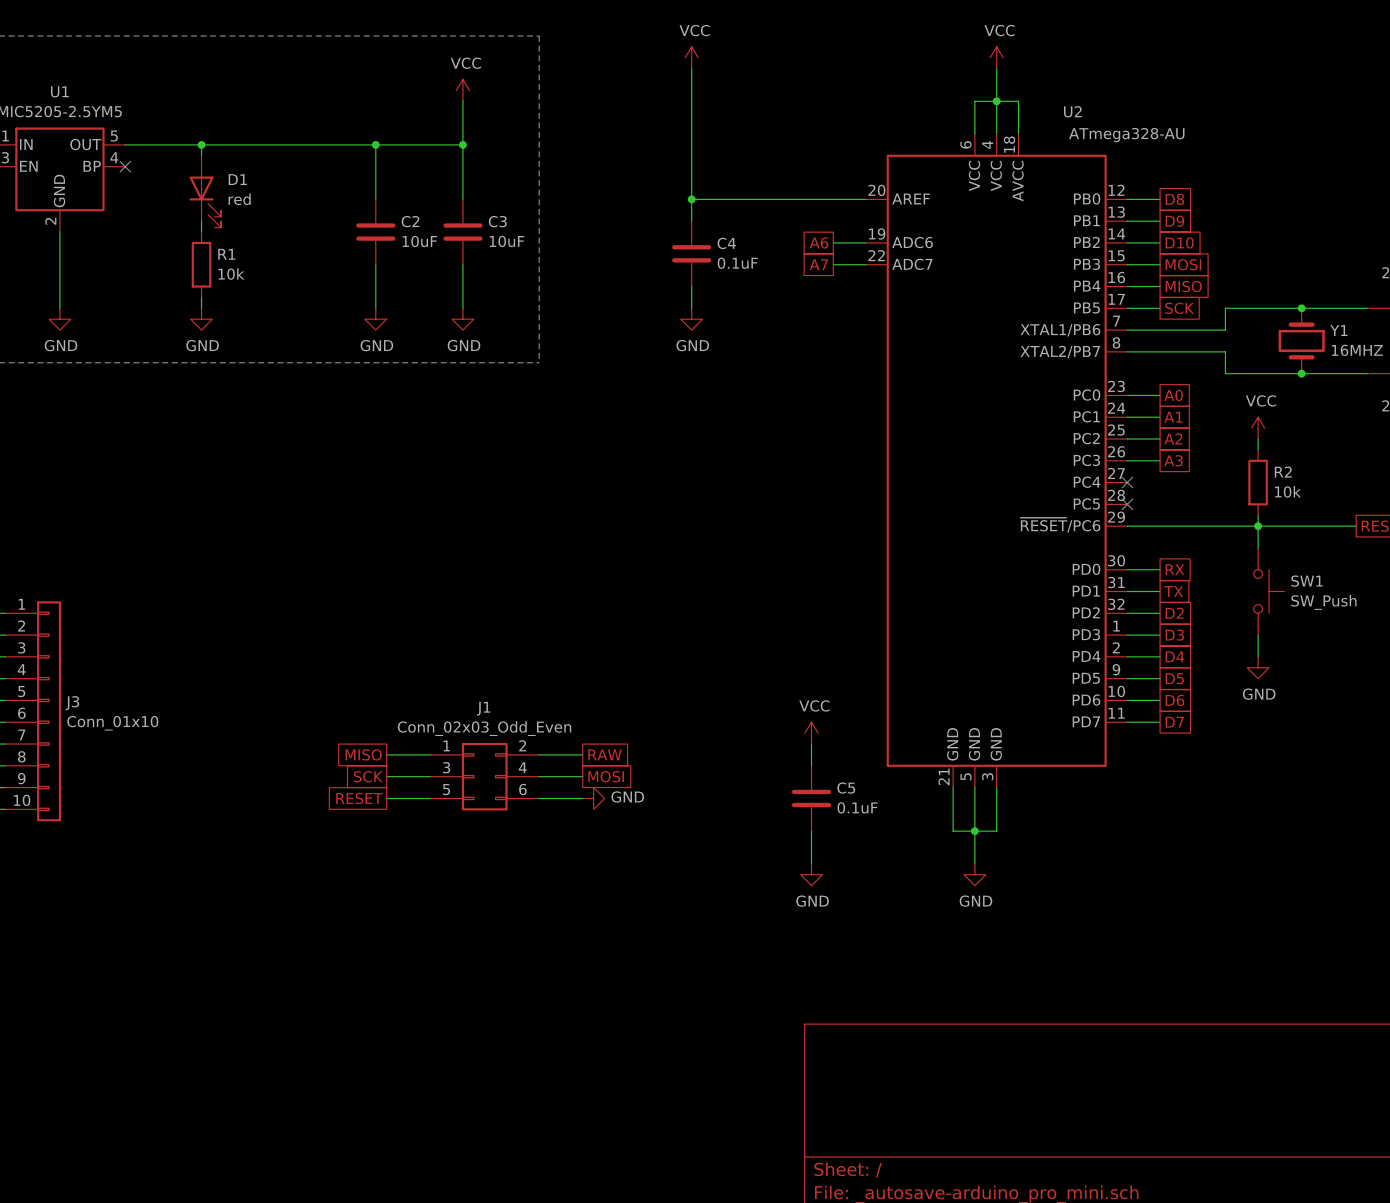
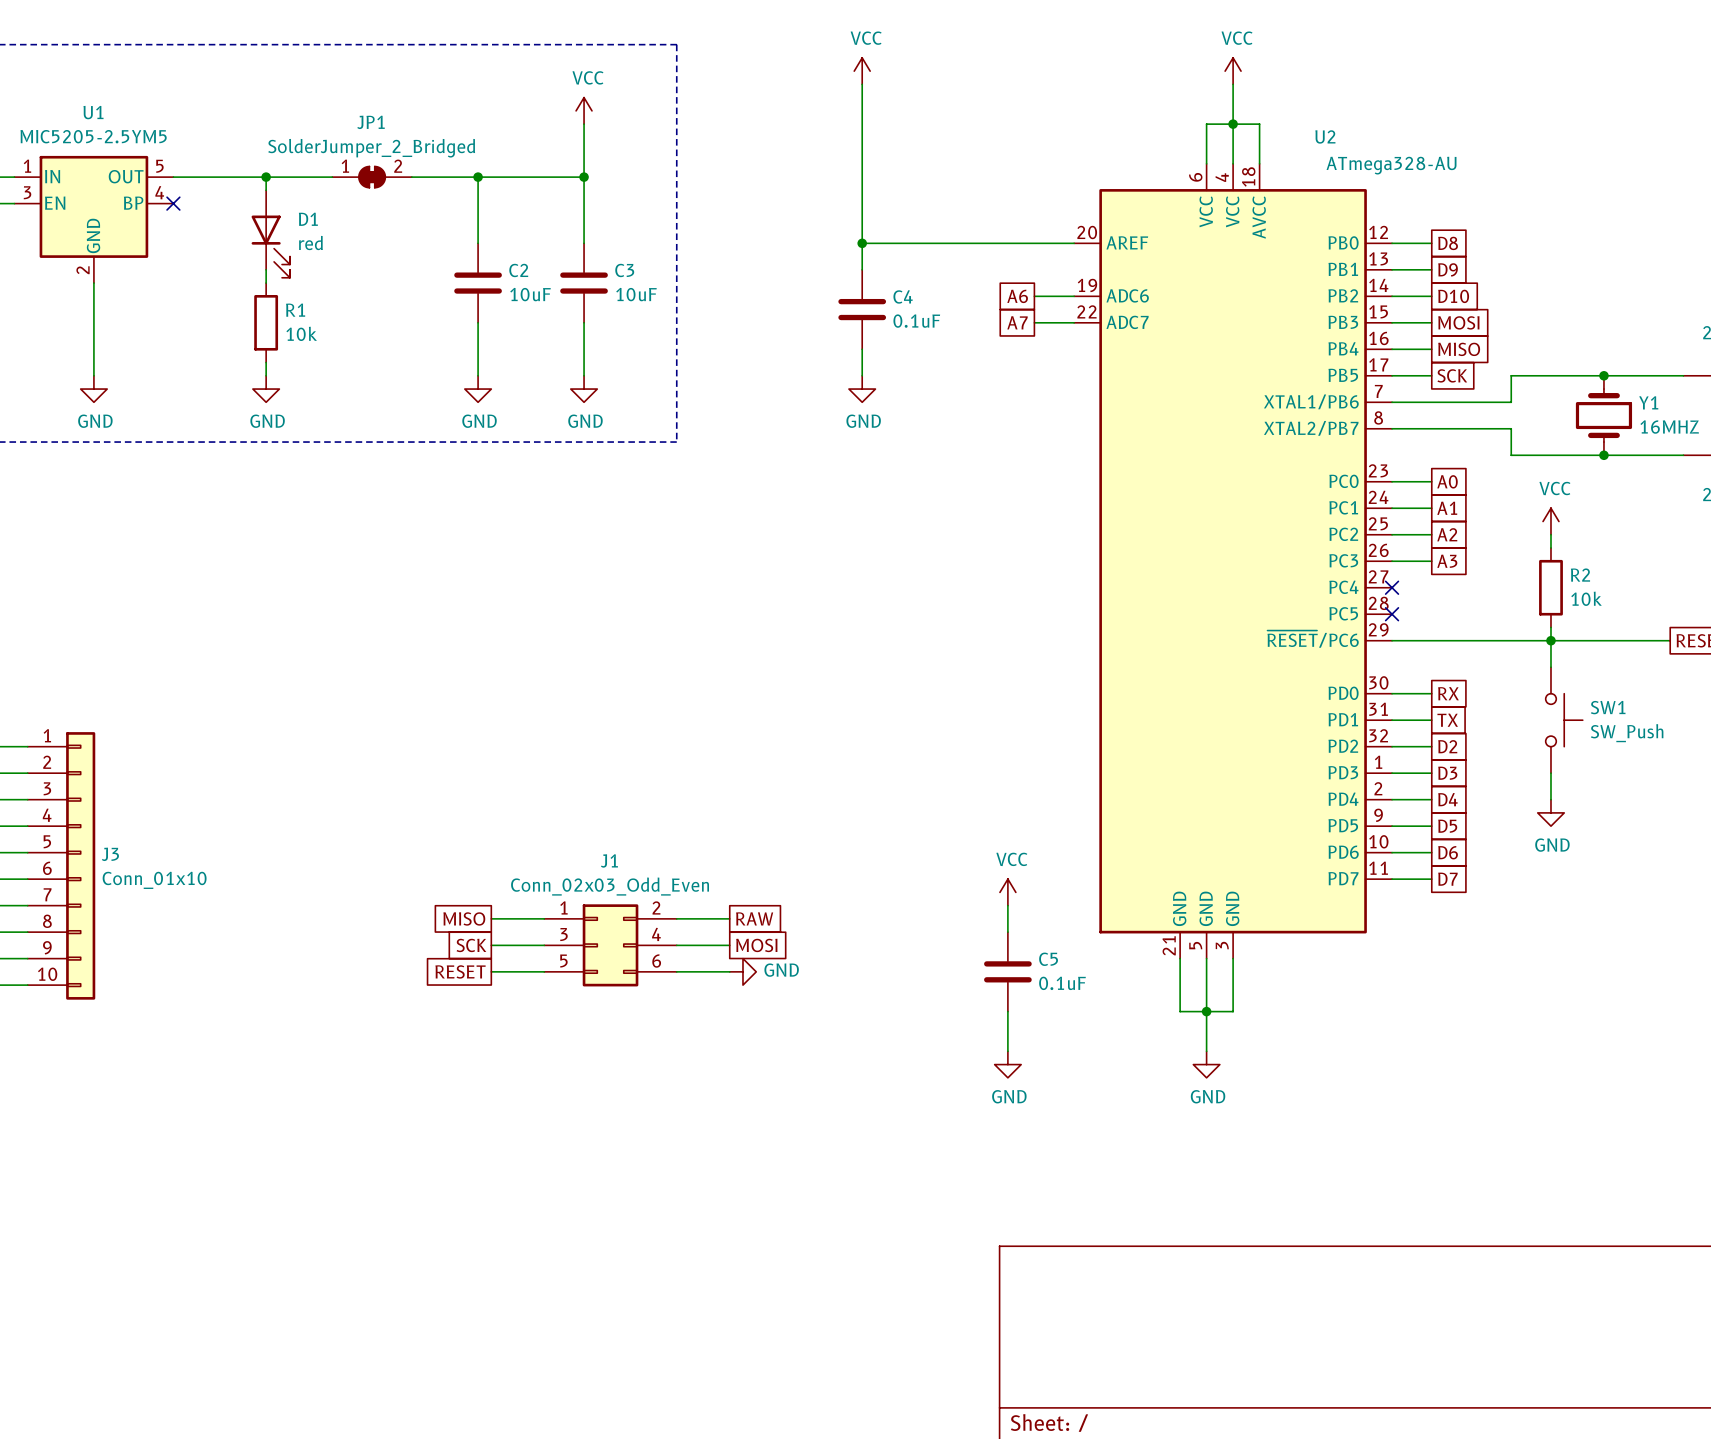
JP1: none -> SolderJumper_2_Bridged (372, 177)

